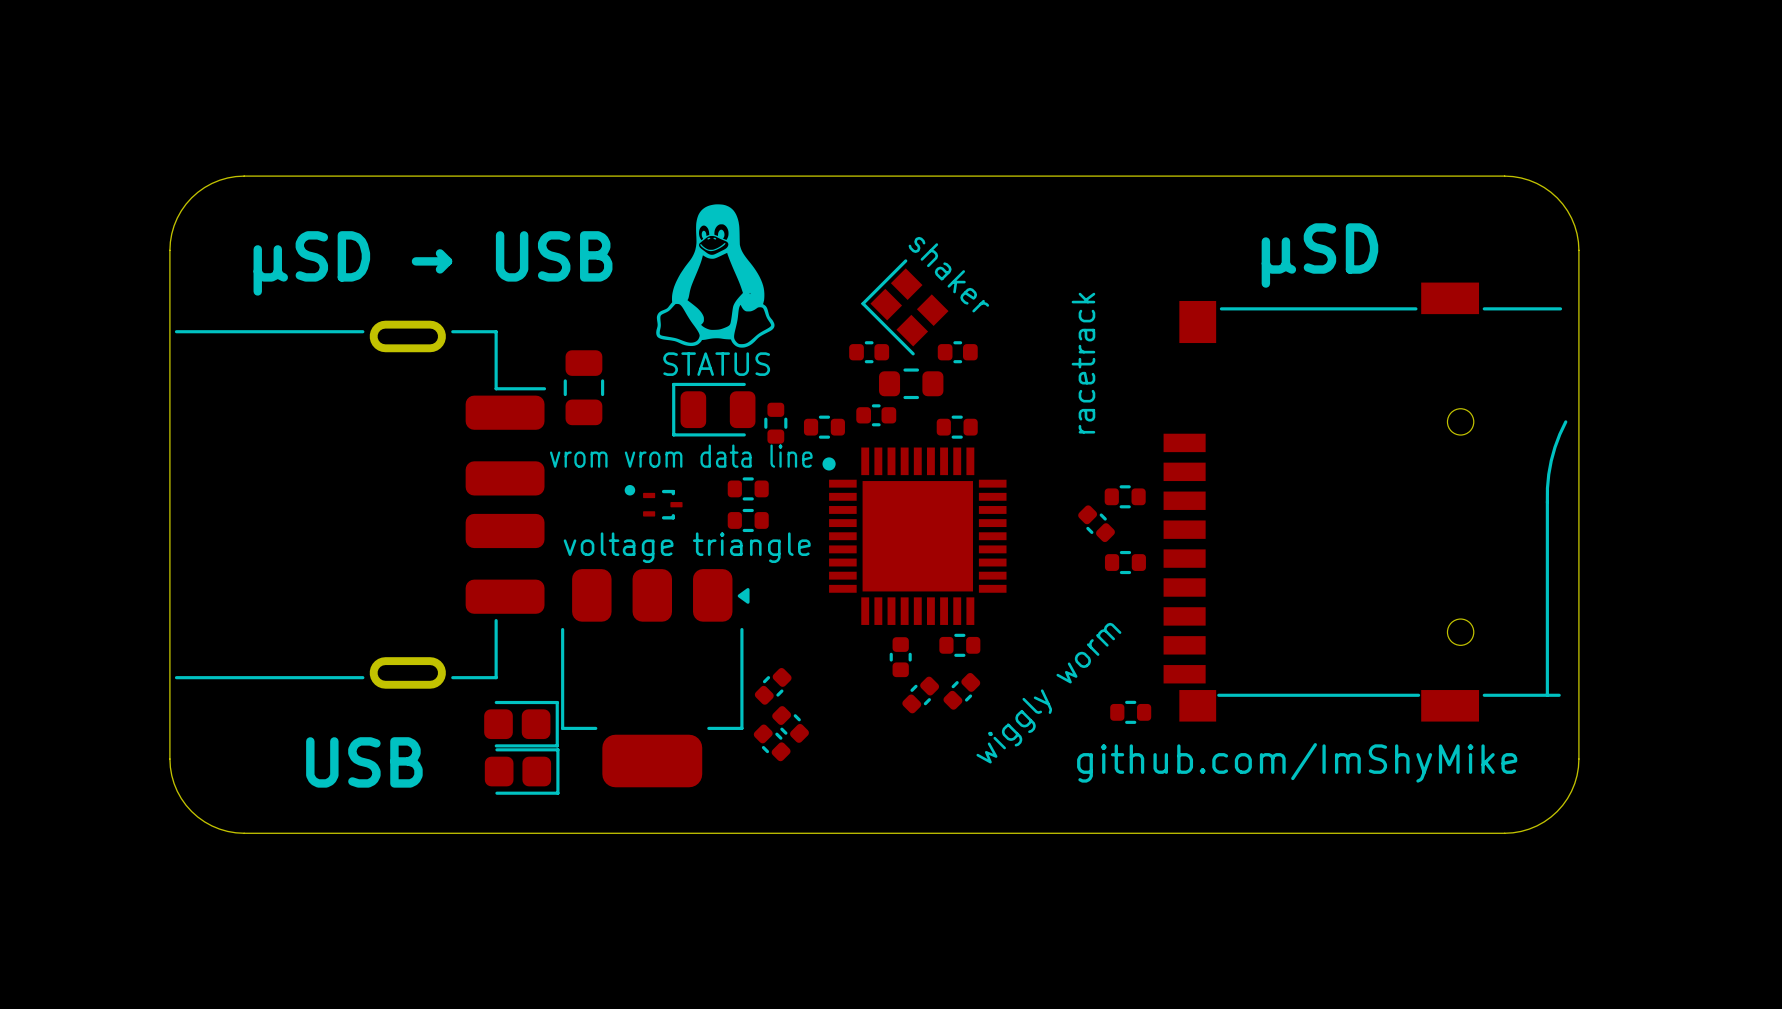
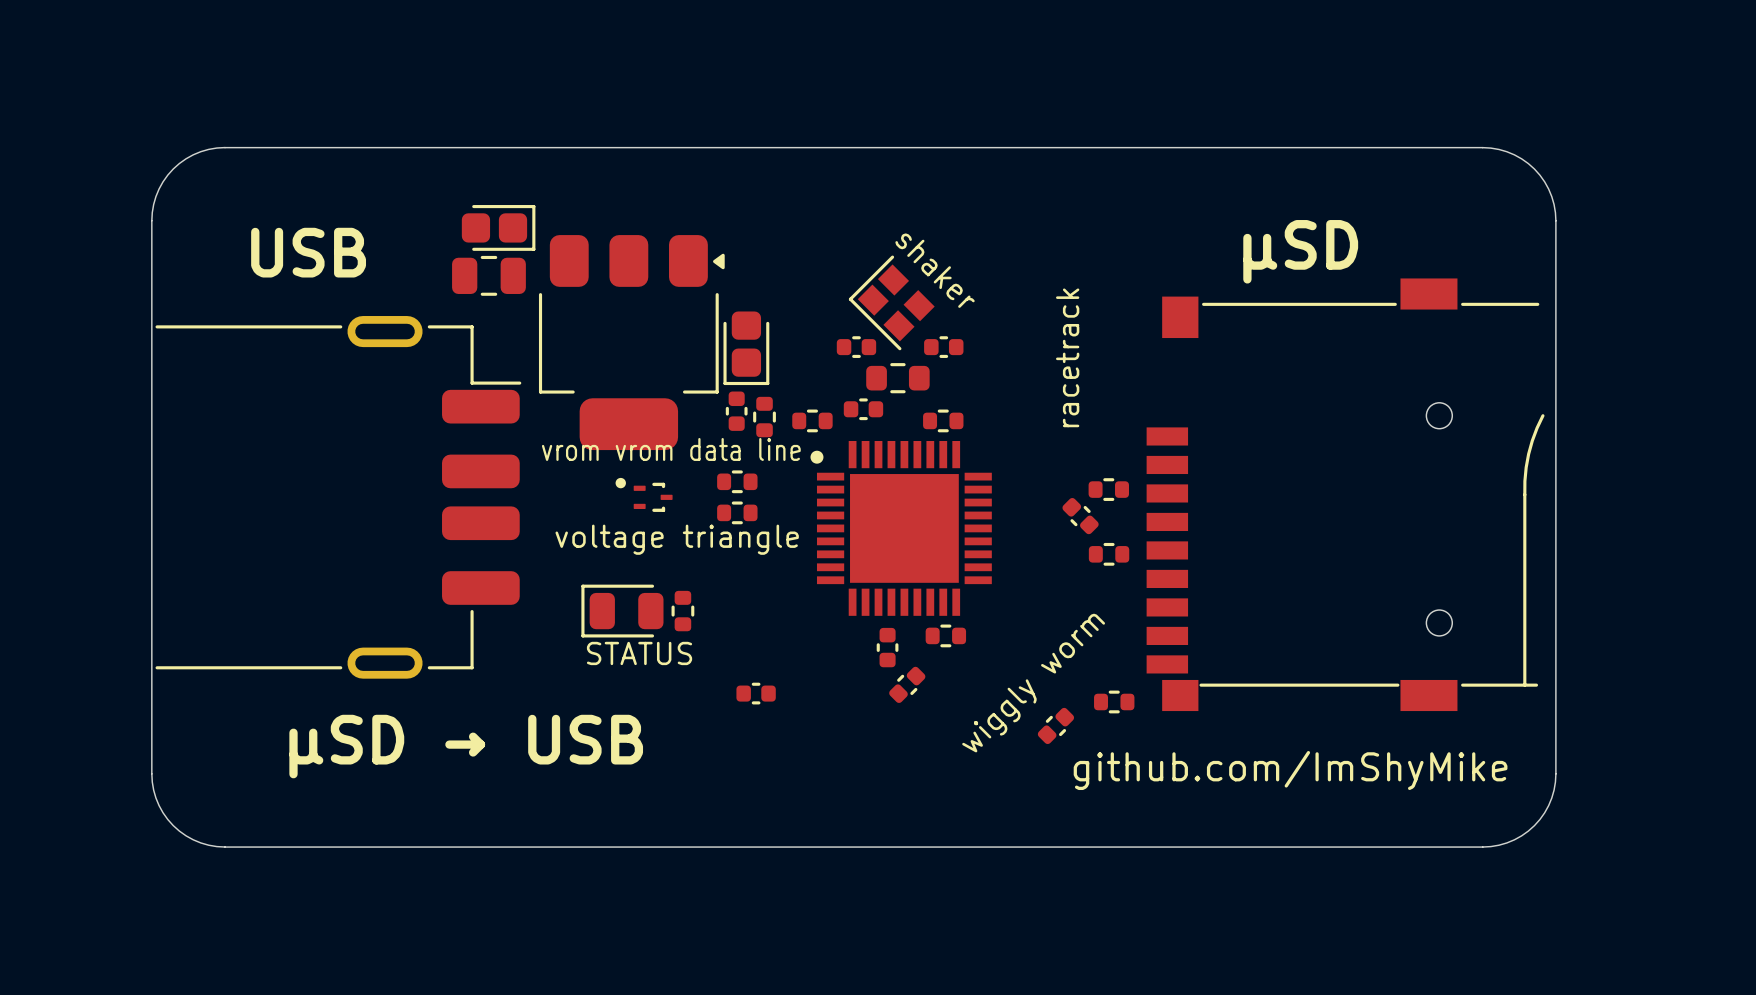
drawing: [656, 204, 775, 348] -> none
part: none -> (498, 227)
board edge: (1578, 250) (1577, 233) (1571, 218) (1557, 197) (1544, 187) (1529, 180) (1504, 176) (244, 176) (219, 180) (204, 187) (191, 197) (181, 210) (174, 225) (169, 250) (170, 767) (177, 791) (186, 805) (197, 817) (219, 829) (244, 833) (1504, 833) (1529, 829) (1544, 821) (1557, 811) (1567, 798) (1574, 783) (1578, 759) -> (1555, 246) (1554, 204) (1548, 189) (1539, 175) (1528, 163) (1514, 154) (1499, 149) (1482, 147) (216, 148) (193, 154) (173, 169) (163, 181) (155, 196) (151, 220) (152, 782) (155, 798) (167, 819) (179, 831) (200, 842) (225, 847) (1490, 846) (1506, 842) (1521, 835) (1534, 825) (1544, 812) (1554, 790) (1555, 747)
text: µSD → USB (433, 263) -> USB (308, 252)
part: none -> (746, 348)
text position: STATUS (716, 364) -> STATUS (639, 653)
part rotation: 0° (583, 387) -> 90° clockwise (488, 275)
part position: (583, 387) -> (488, 275)
part position: (713, 409) -> (622, 611)
part: none -> (736, 411)
part position: (360, 504) -> (338, 497)
part: none -> (682, 611)
part position: (655, 678) -> (631, 342)
part: (773, 686) -> none
part position: (961, 691) -> (1055, 725)
part: none -> (756, 693)
part: (521, 724) -> none
part: (790, 724) -> none
part: (772, 742) -> none
text: USB (364, 762) -> µSD → USB (466, 746)
text position: github.com/ImShyMike (1297, 762) -> github.com/ImShyMike (1290, 770)
part: (522, 771) -> none

